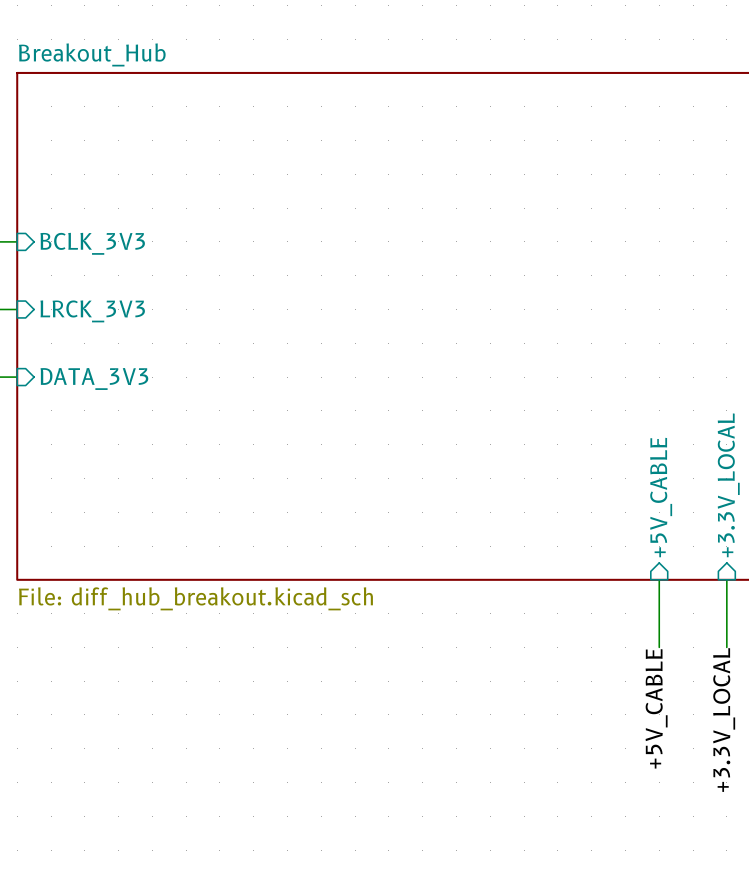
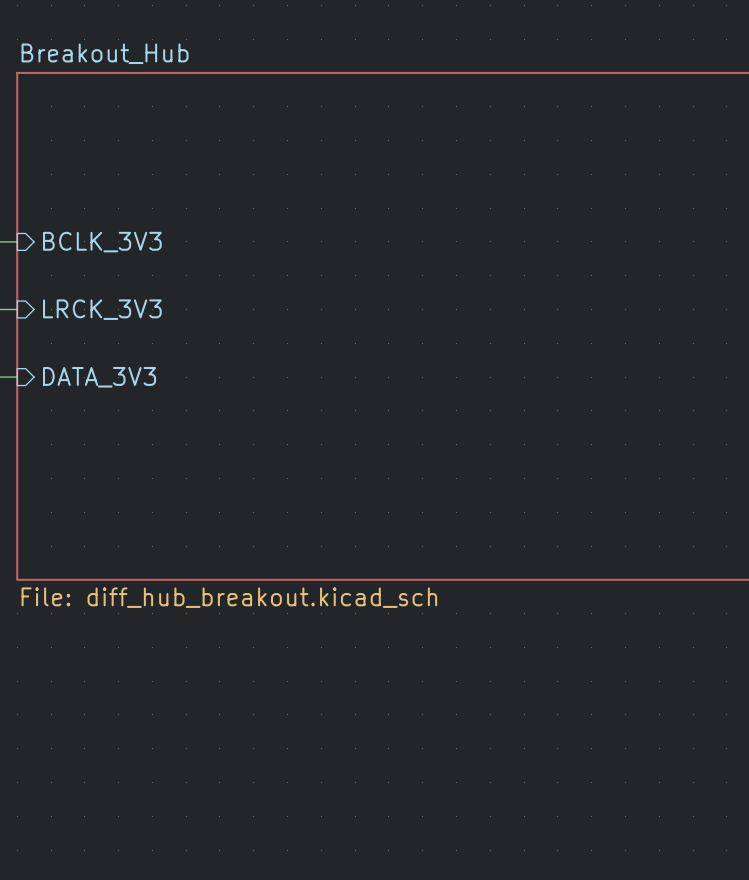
sheet pin: +3.3V_LOCAL (728, 485) -> none
sheet pin: +5V_CABLE (661, 497) -> none
wire: (659, 579) (659, 647) -> none
wire: (726, 579) (726, 647) -> none
label: +5V_CABLE (656, 708) -> none
label: +3.3V_LOCAL (724, 720) -> none

